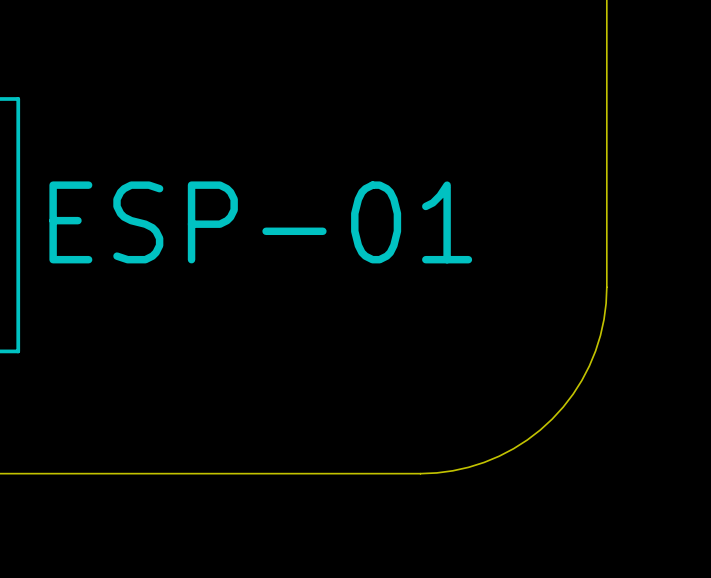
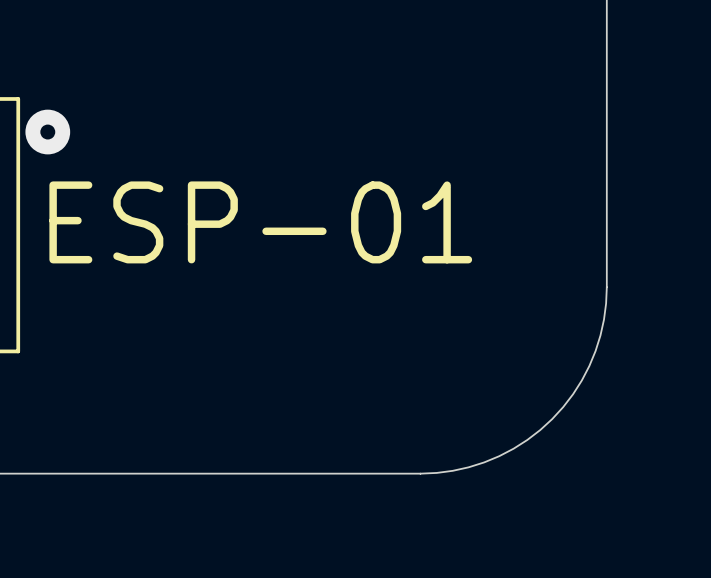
via: none -> (47, 132)

